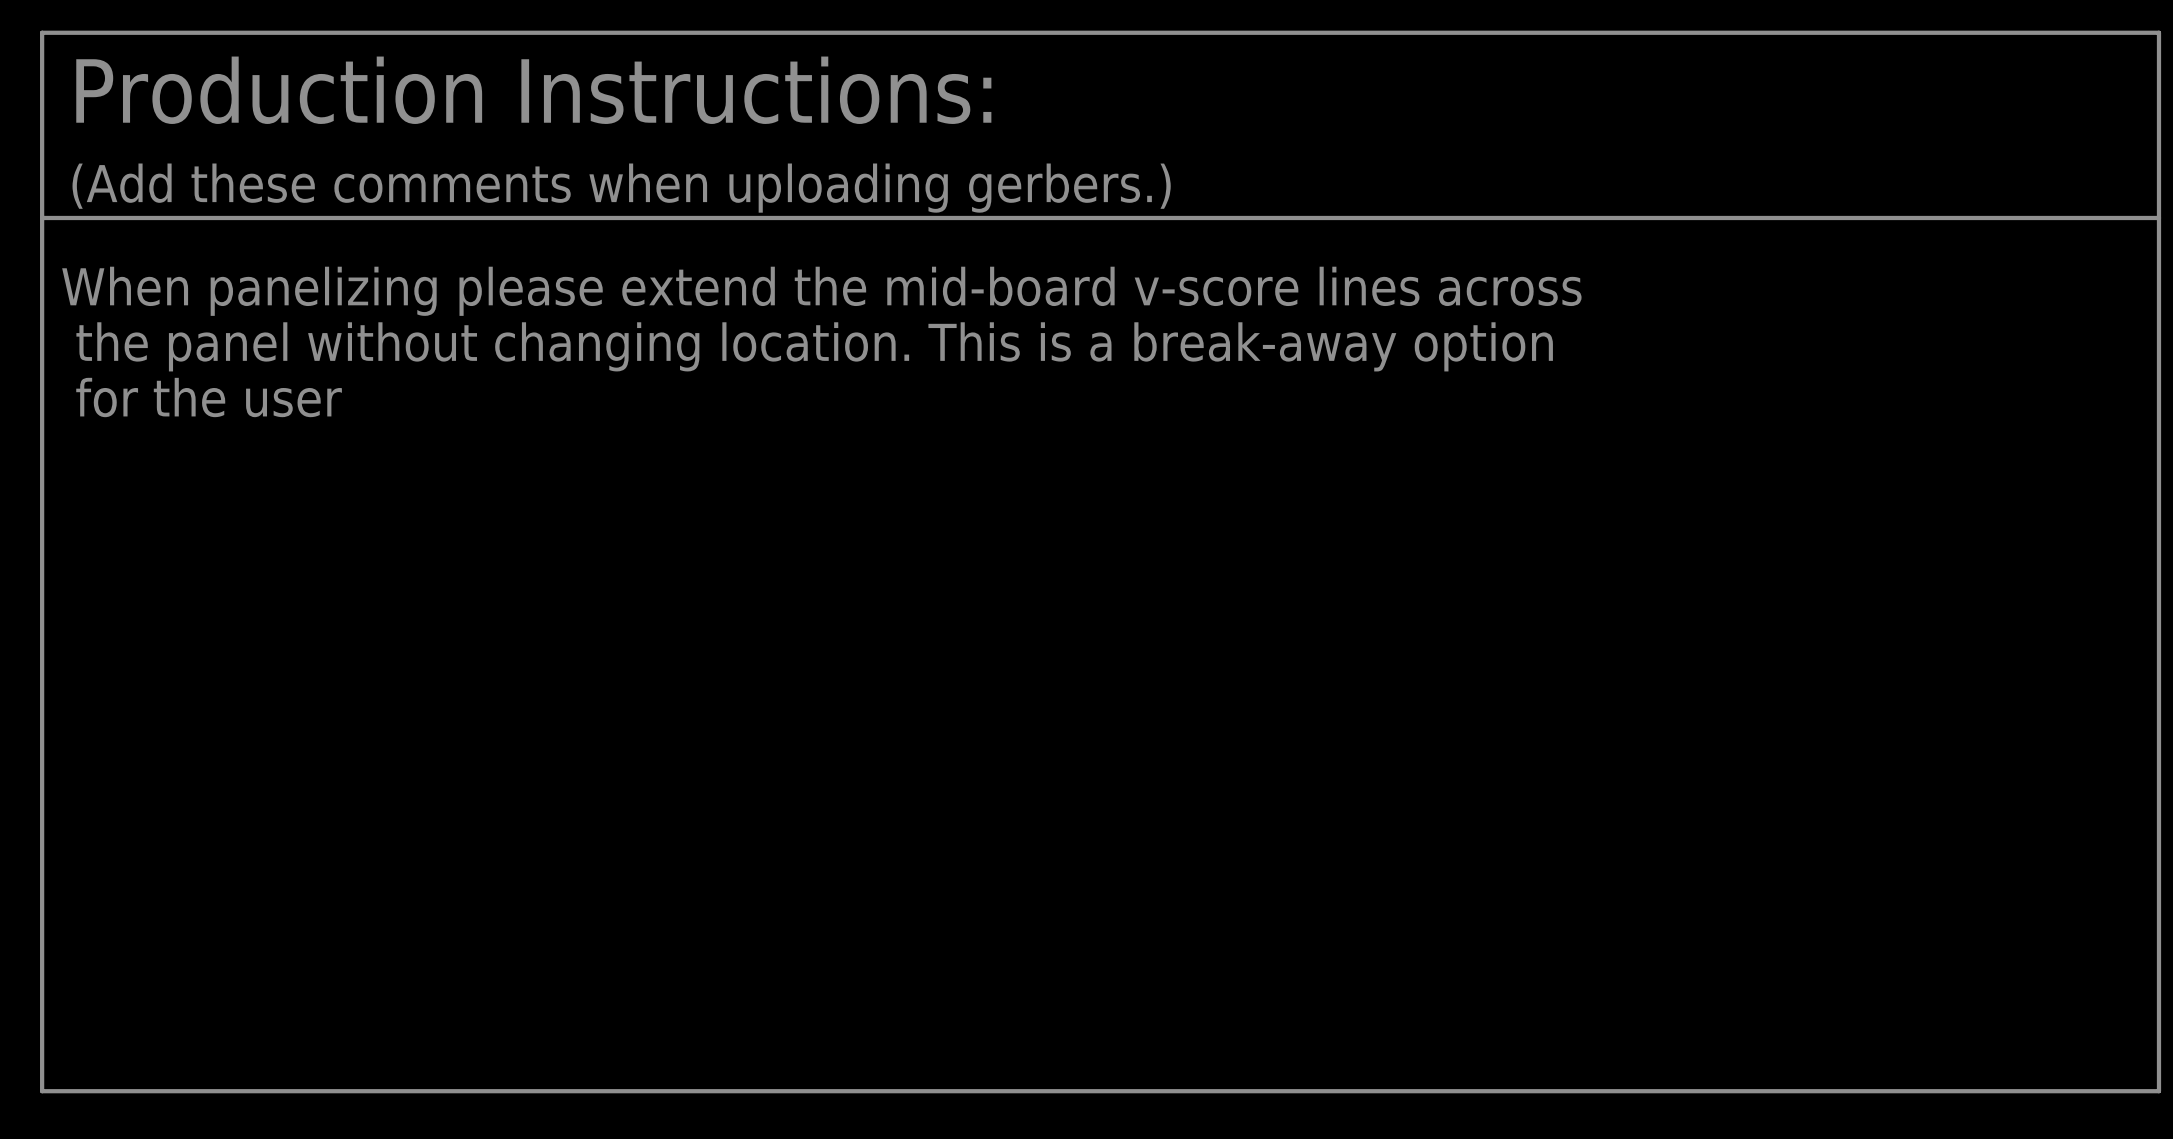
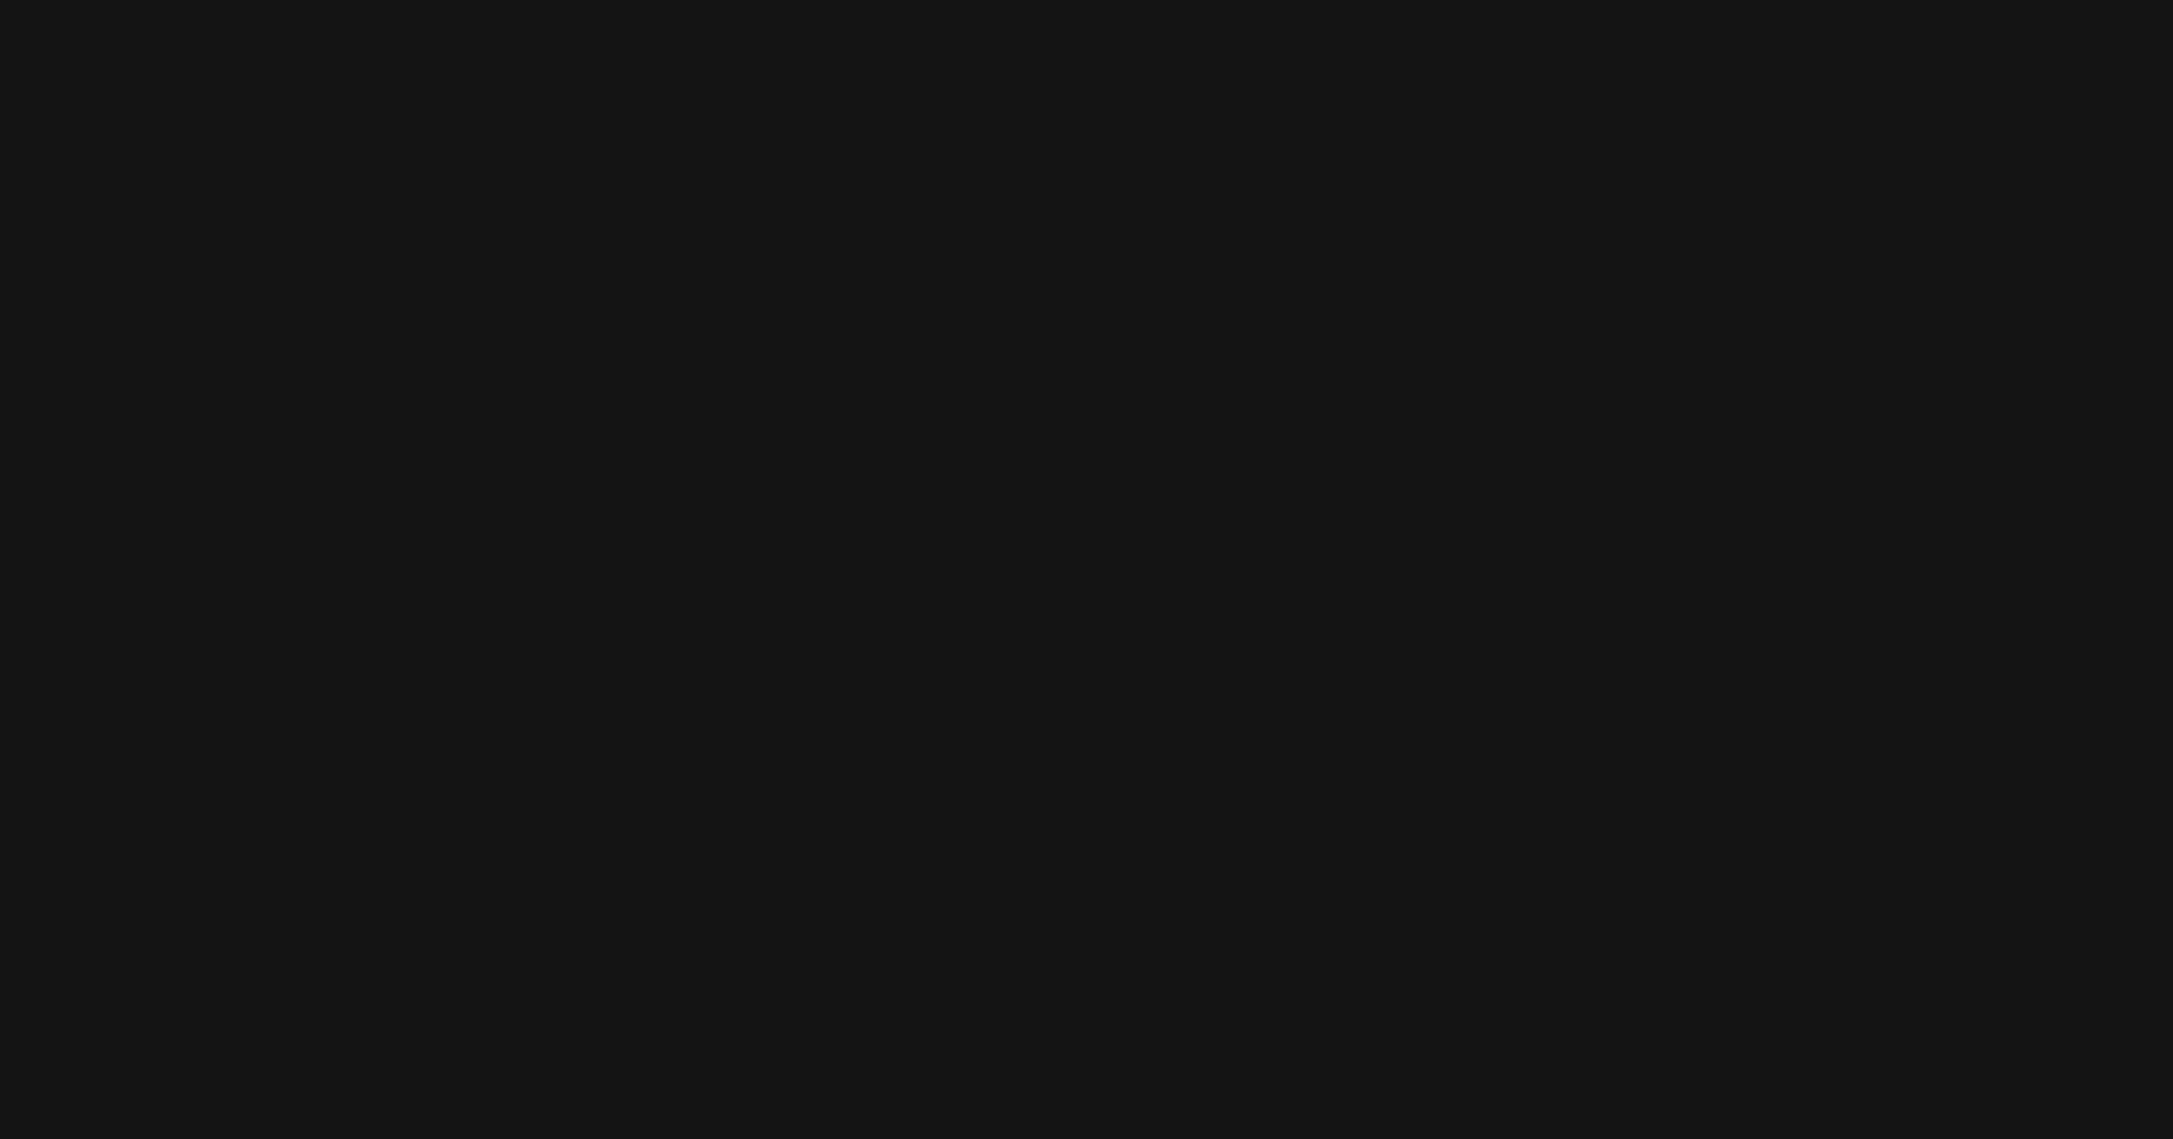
drawing: [40, 30, 2162, 1094] -> none
text: When panelizing please extend the mid-board v-score lines across (821, 291) -> none
text: the panel without changing location. This is a break-away option (814, 346) -> none
text: for the user (209, 397) -> none

